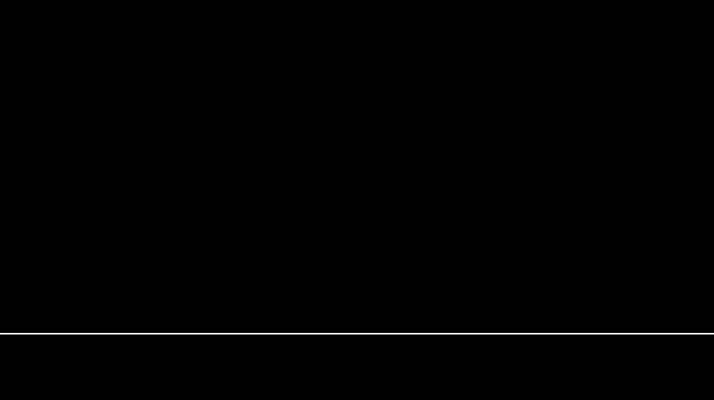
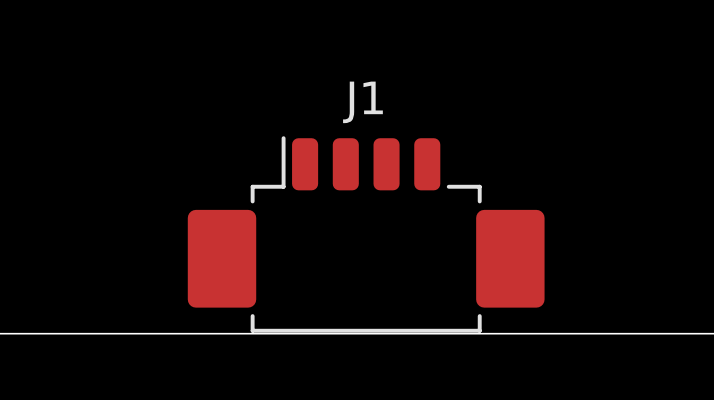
J1: none -> (366, 234)

